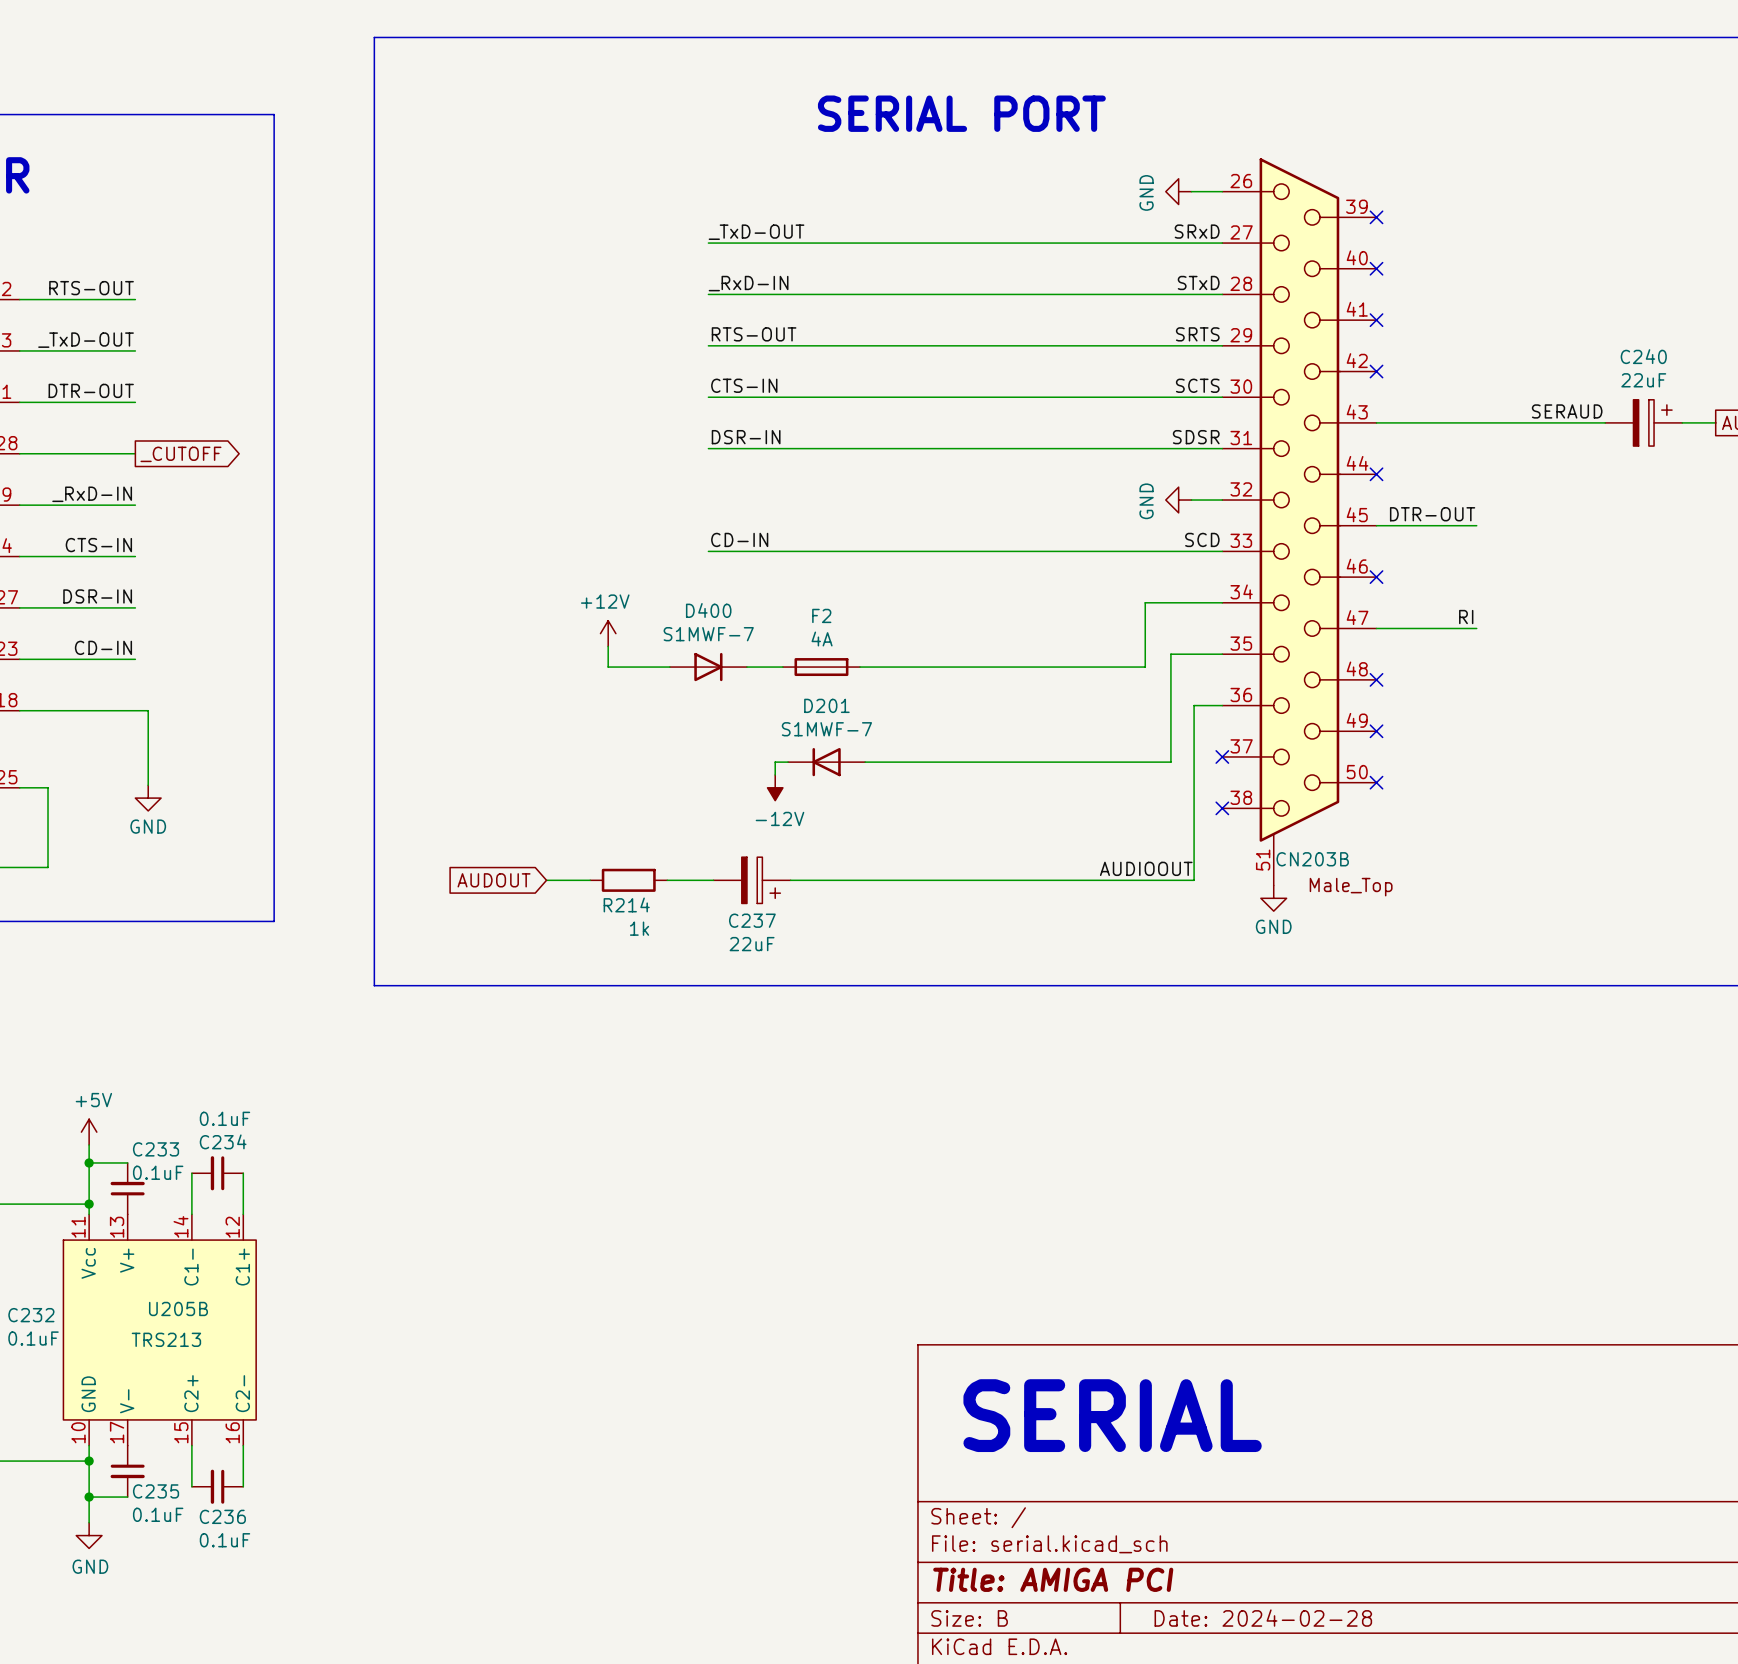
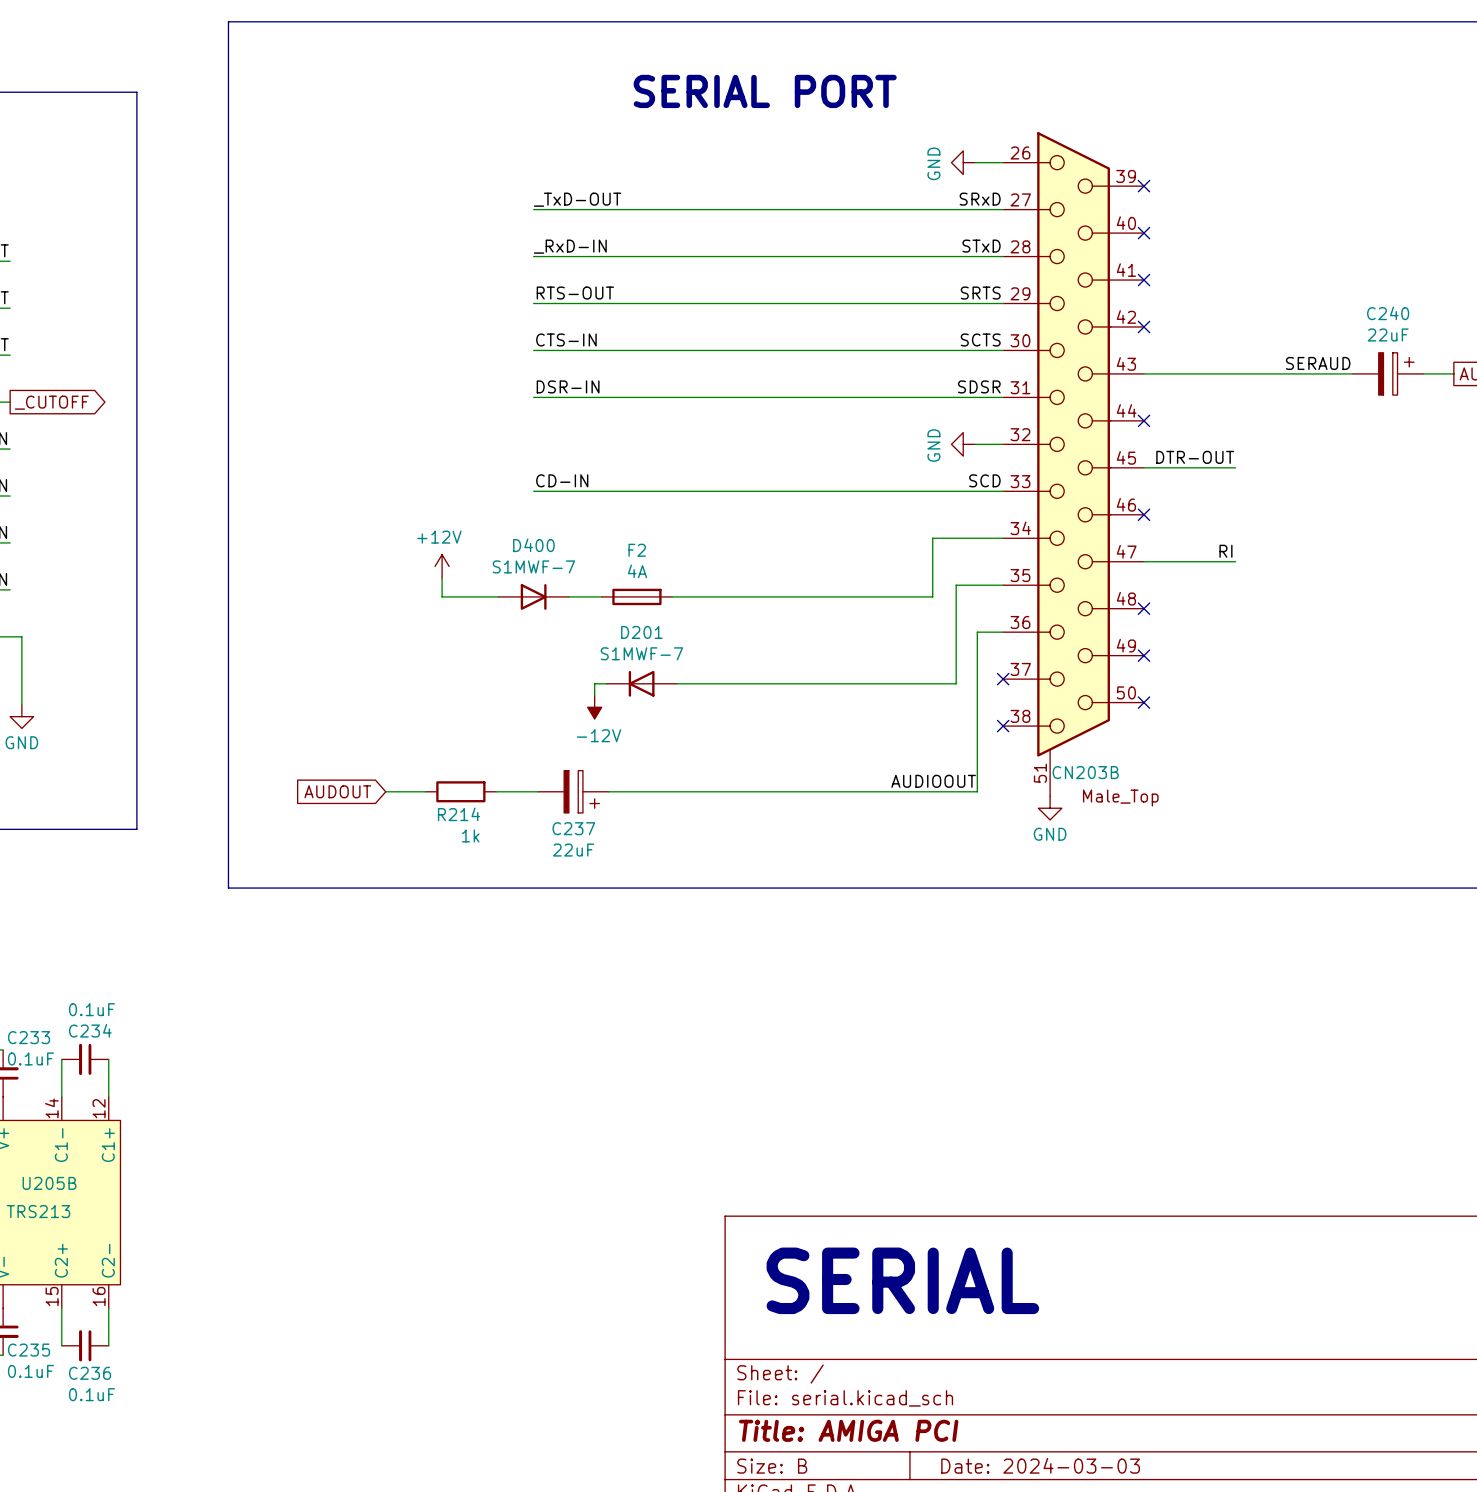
title block: Date: 2024-02-28 (1263, 1618) -> Date: 2024-03-03 (1040, 1465)

